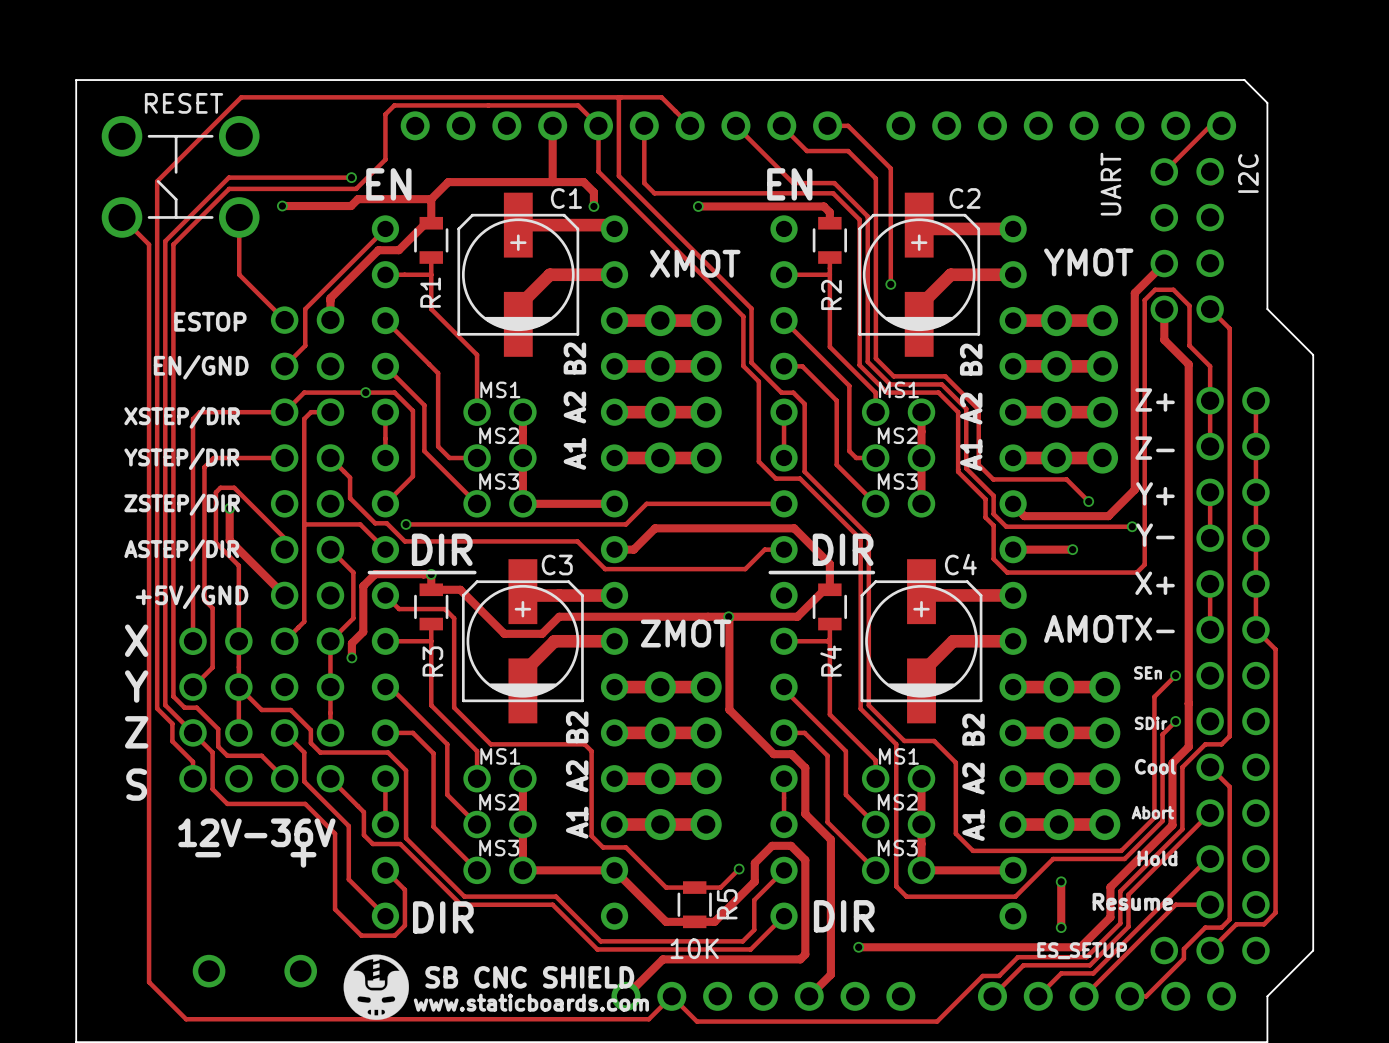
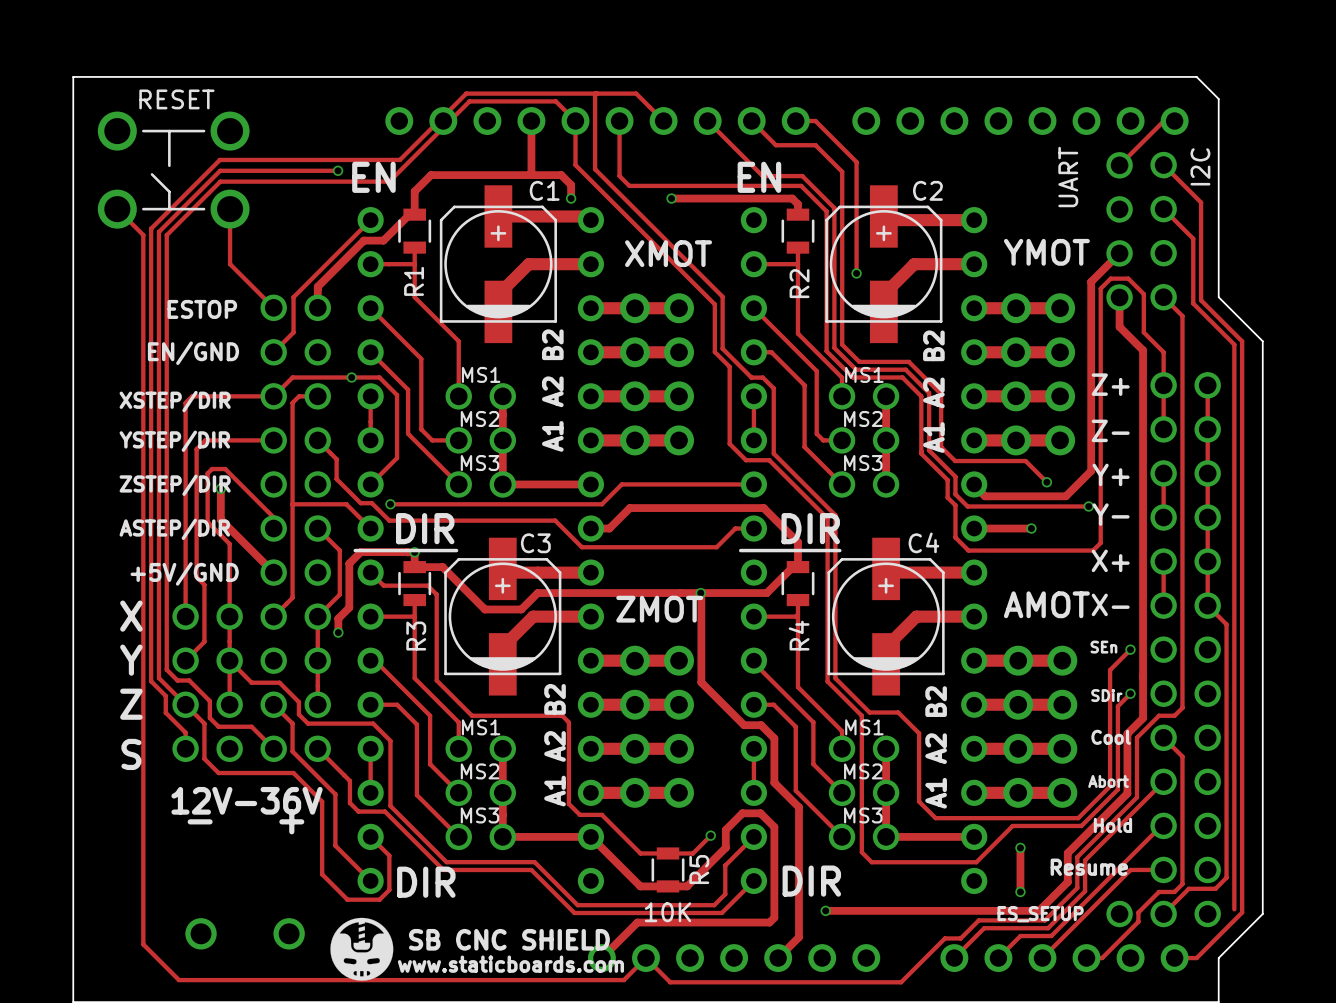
track: (484, 97) (241, 97) (157, 181) (157, 237) -> (466, 93) (399, 159) (219, 159) (151, 228)
track: (488, 105) (394, 105) (385, 114) (385, 159) (356, 188) -> (469, 101) (389, 181) (342, 181)
track: none -> (1163, 165) (1201, 202) (1201, 300) (1242, 341) (1242, 912) (1196, 958) (1174, 958)
track: (431, 199) (357, 199) (351, 206) (282, 206) -> none
via: (282, 206) -> none
track: none -> (1163, 209) (1193, 238) (1193, 303) (1234, 344) (1234, 909)

